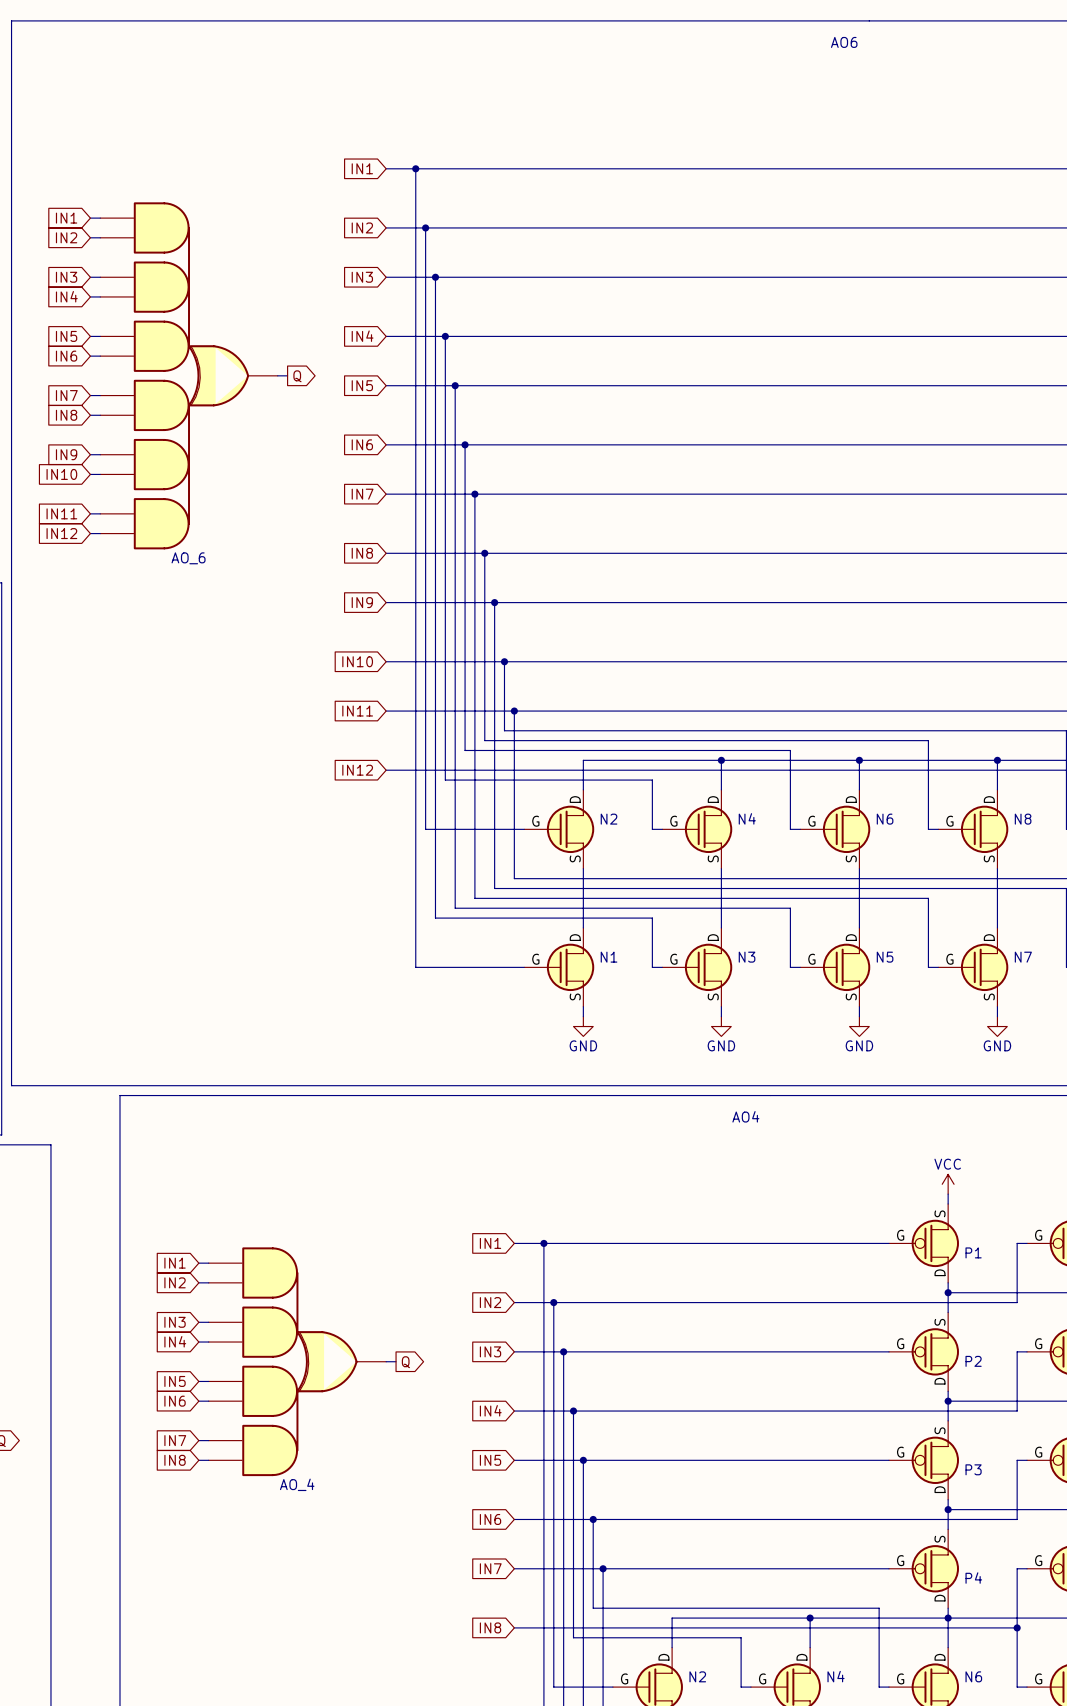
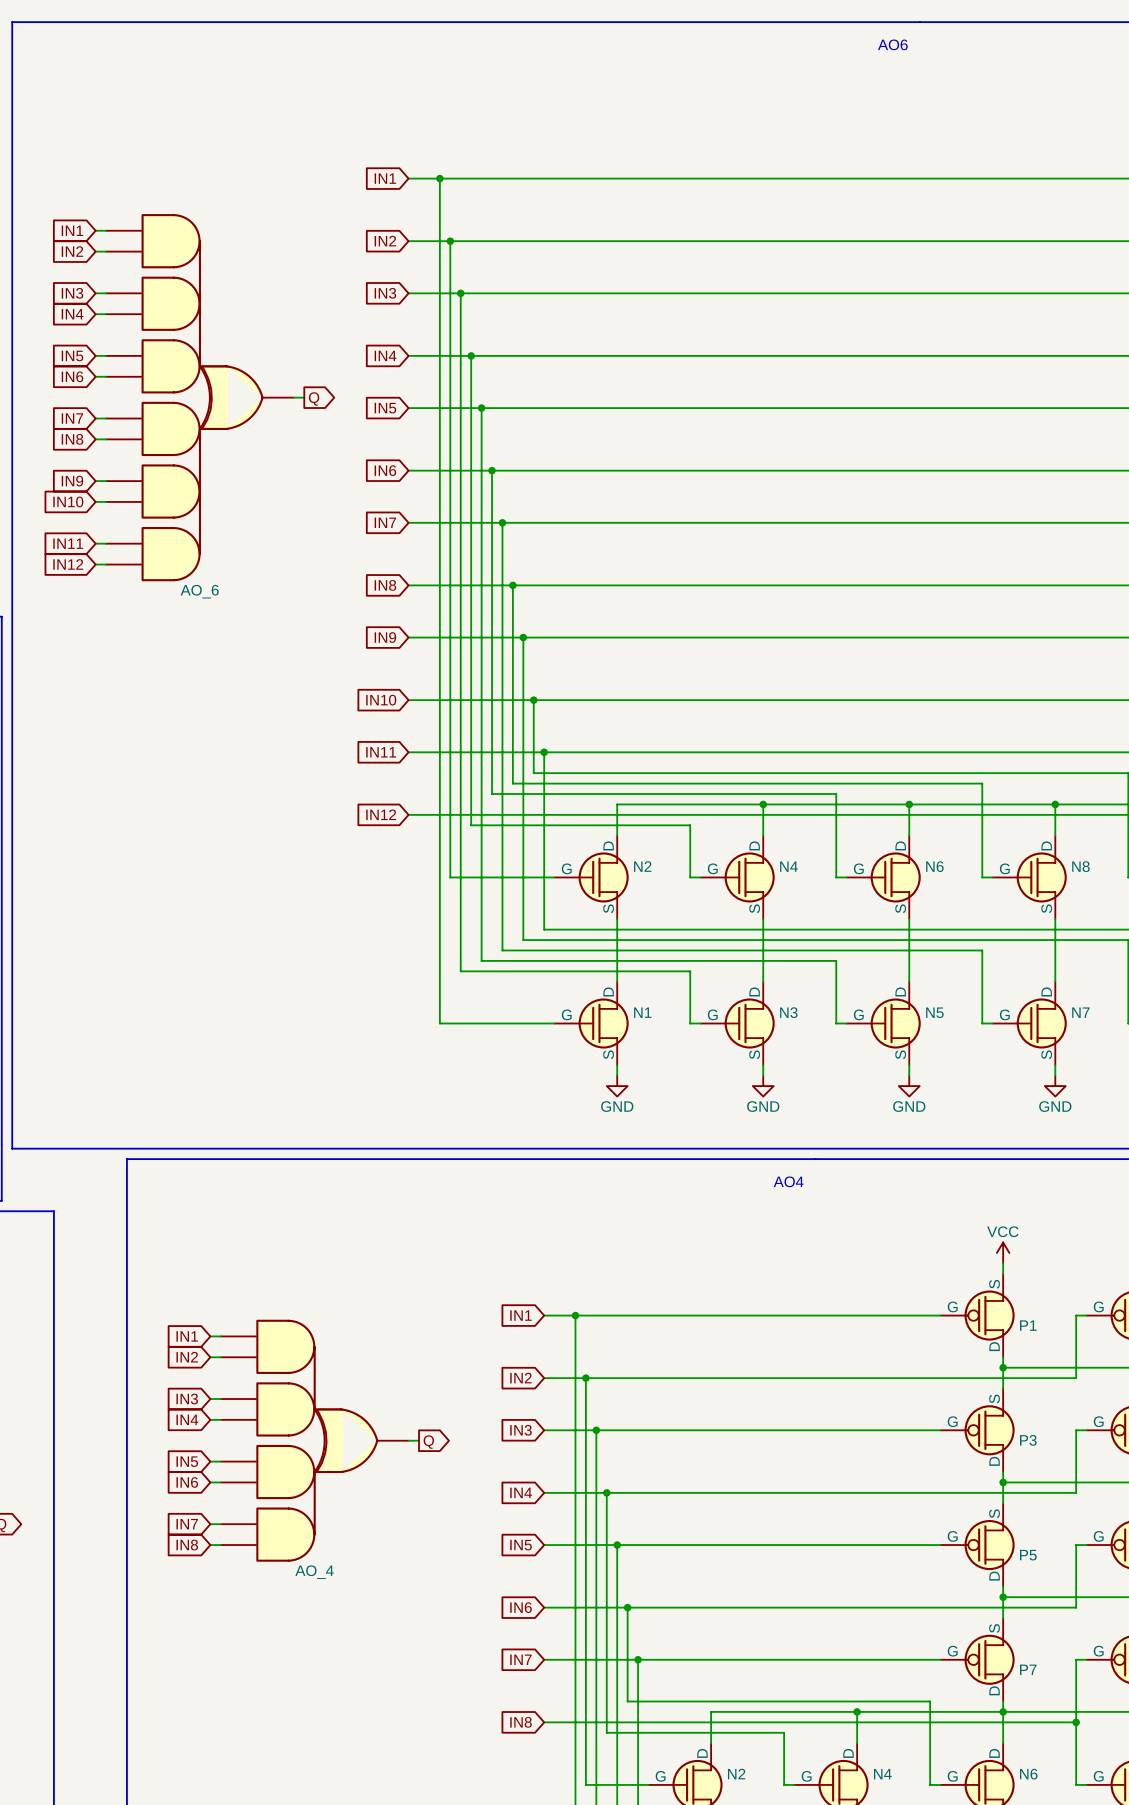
P2 name: P2 (973, 1361) -> P3 (1028, 1440)
P3 name: P3 (973, 1469) -> P5 (1028, 1555)
P4 name: P4 (973, 1578) -> P7 (1028, 1669)

